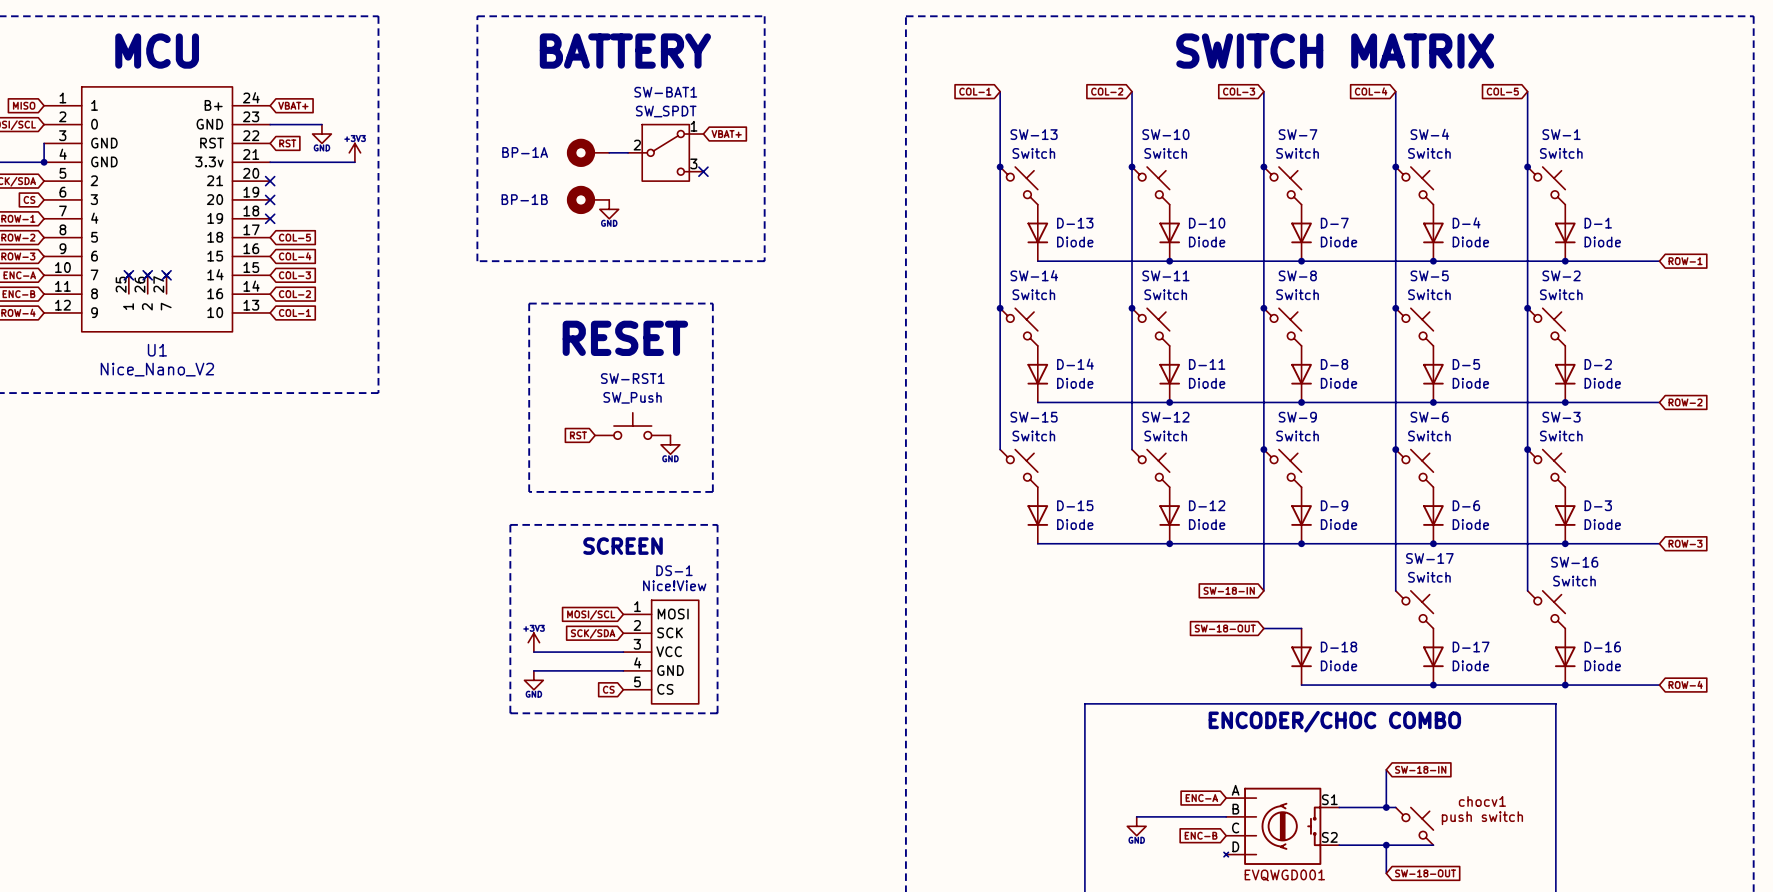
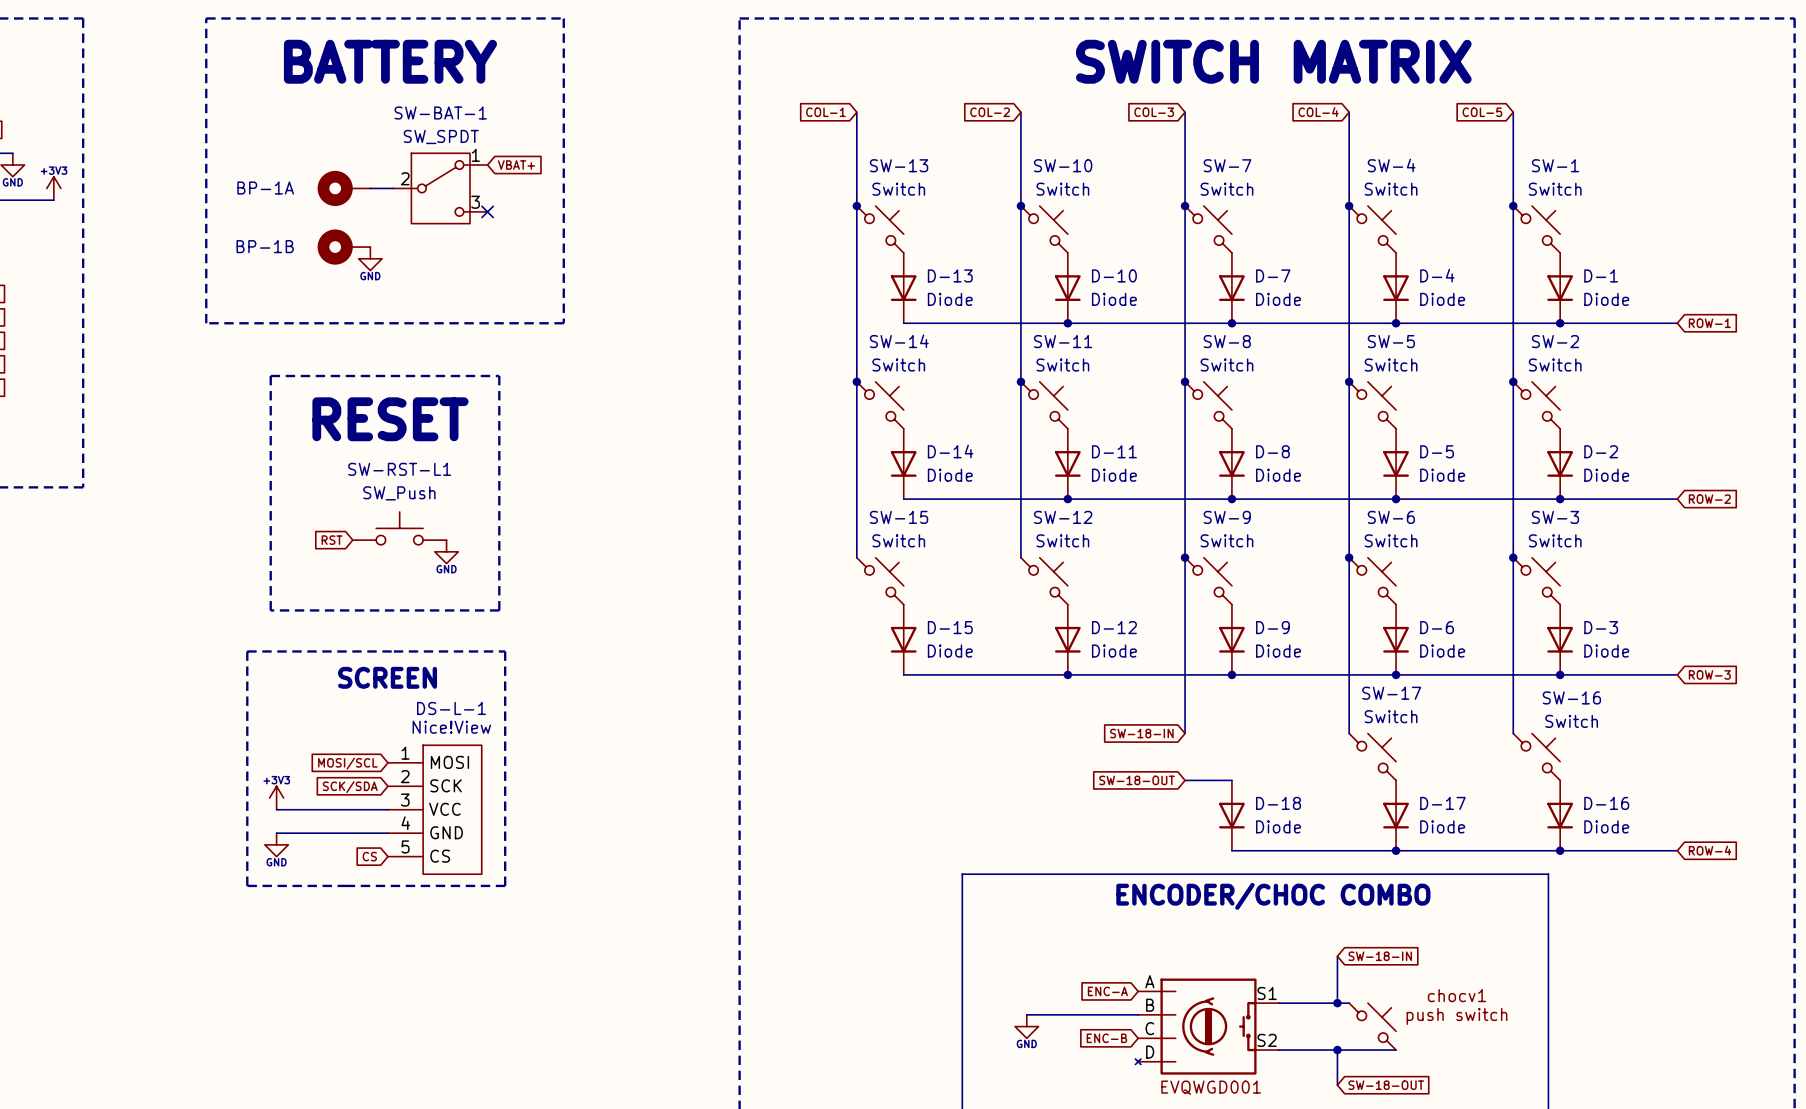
SW-BAT1 name: SW-BAT1 (665, 92) -> SW-BAT-1 (440, 112)
SW-RST1 name: SW-RST1 (632, 378) -> SW-RST-L1 (399, 469)
DS-1 name: DS-1 (674, 570) -> DS-L-1 (451, 708)

